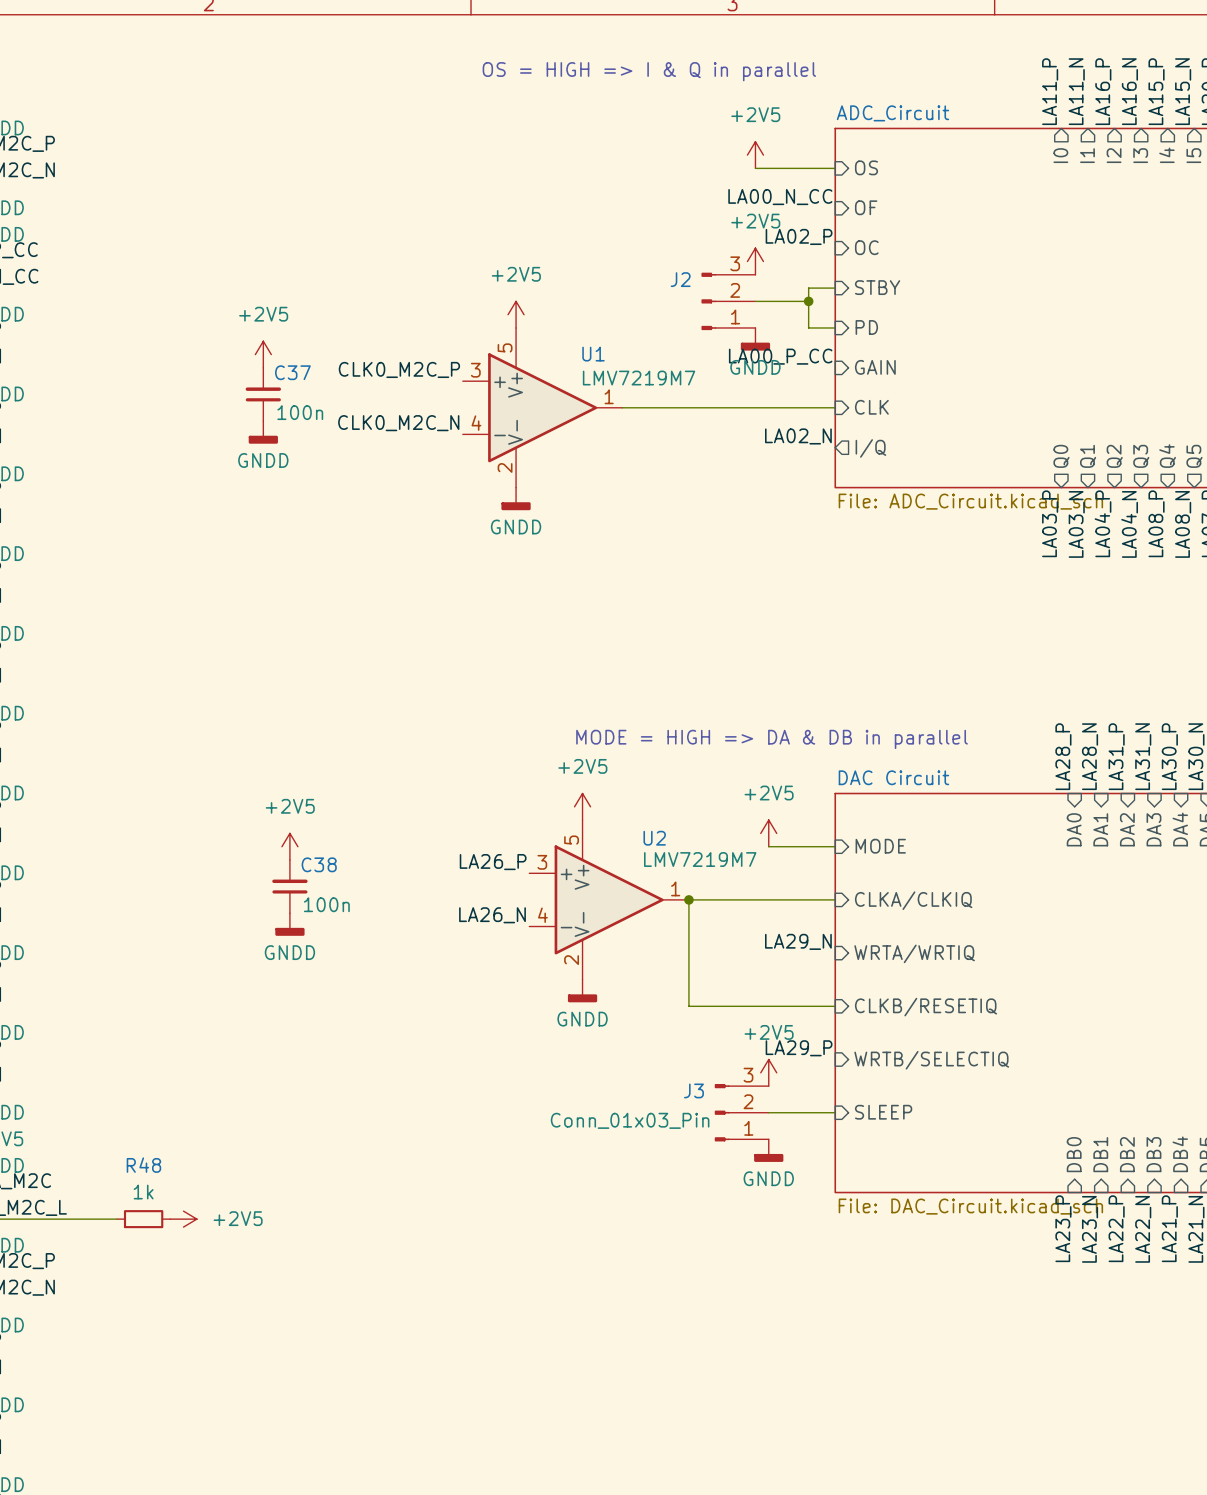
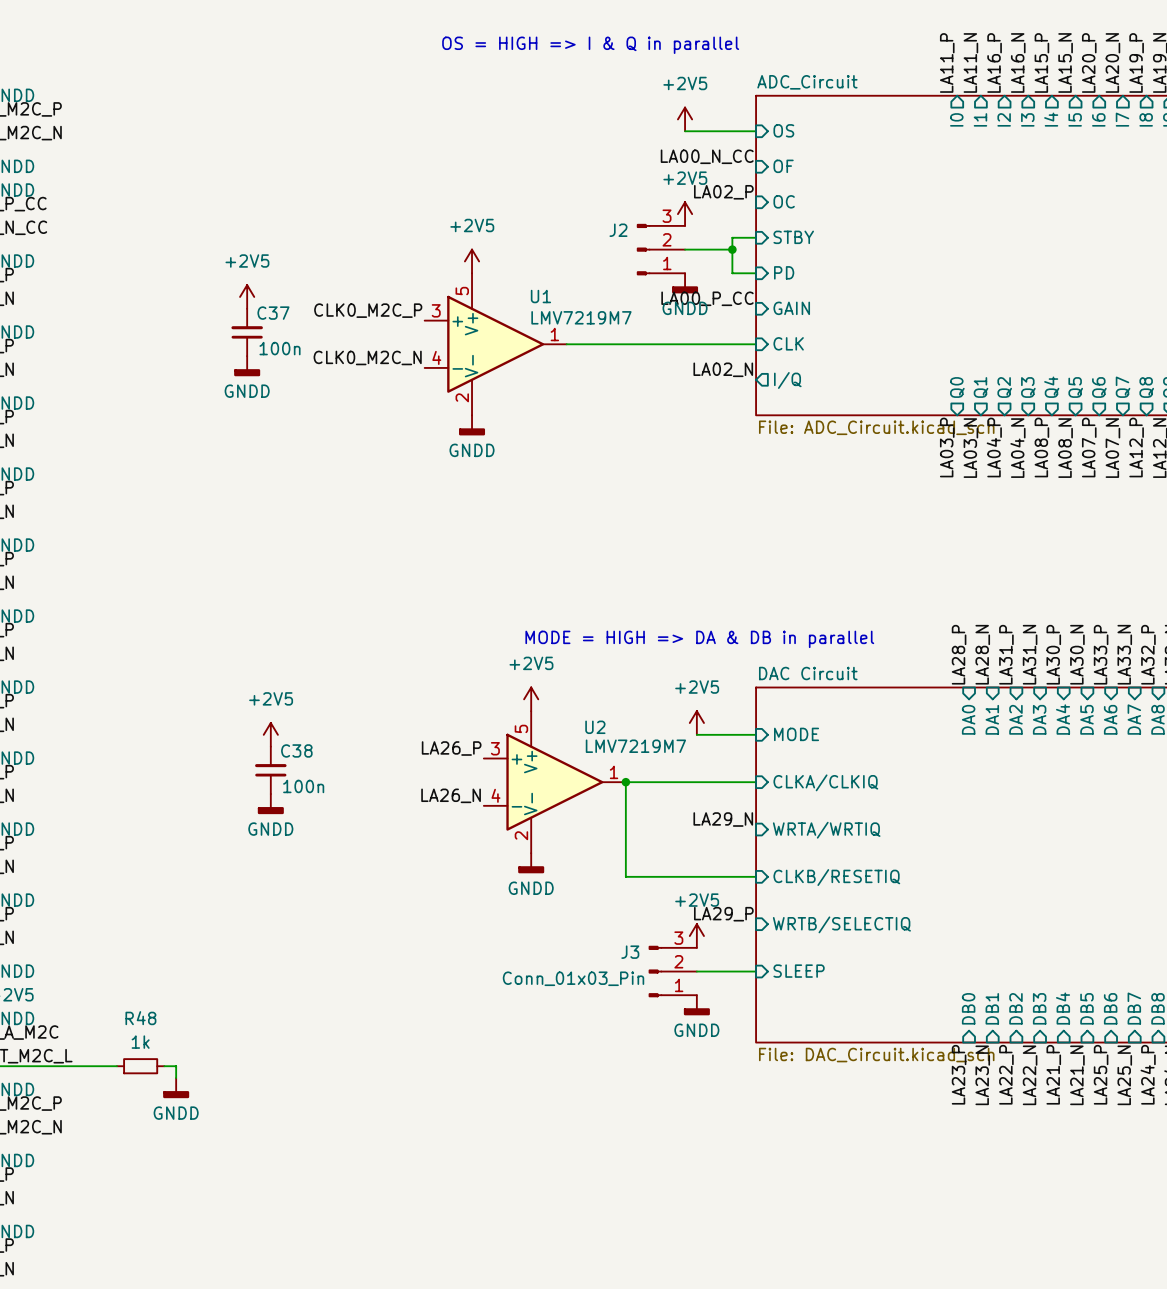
power symbol: +2V5 (183, 1219) -> none
power symbol: none -> GNDD (176, 1088)

